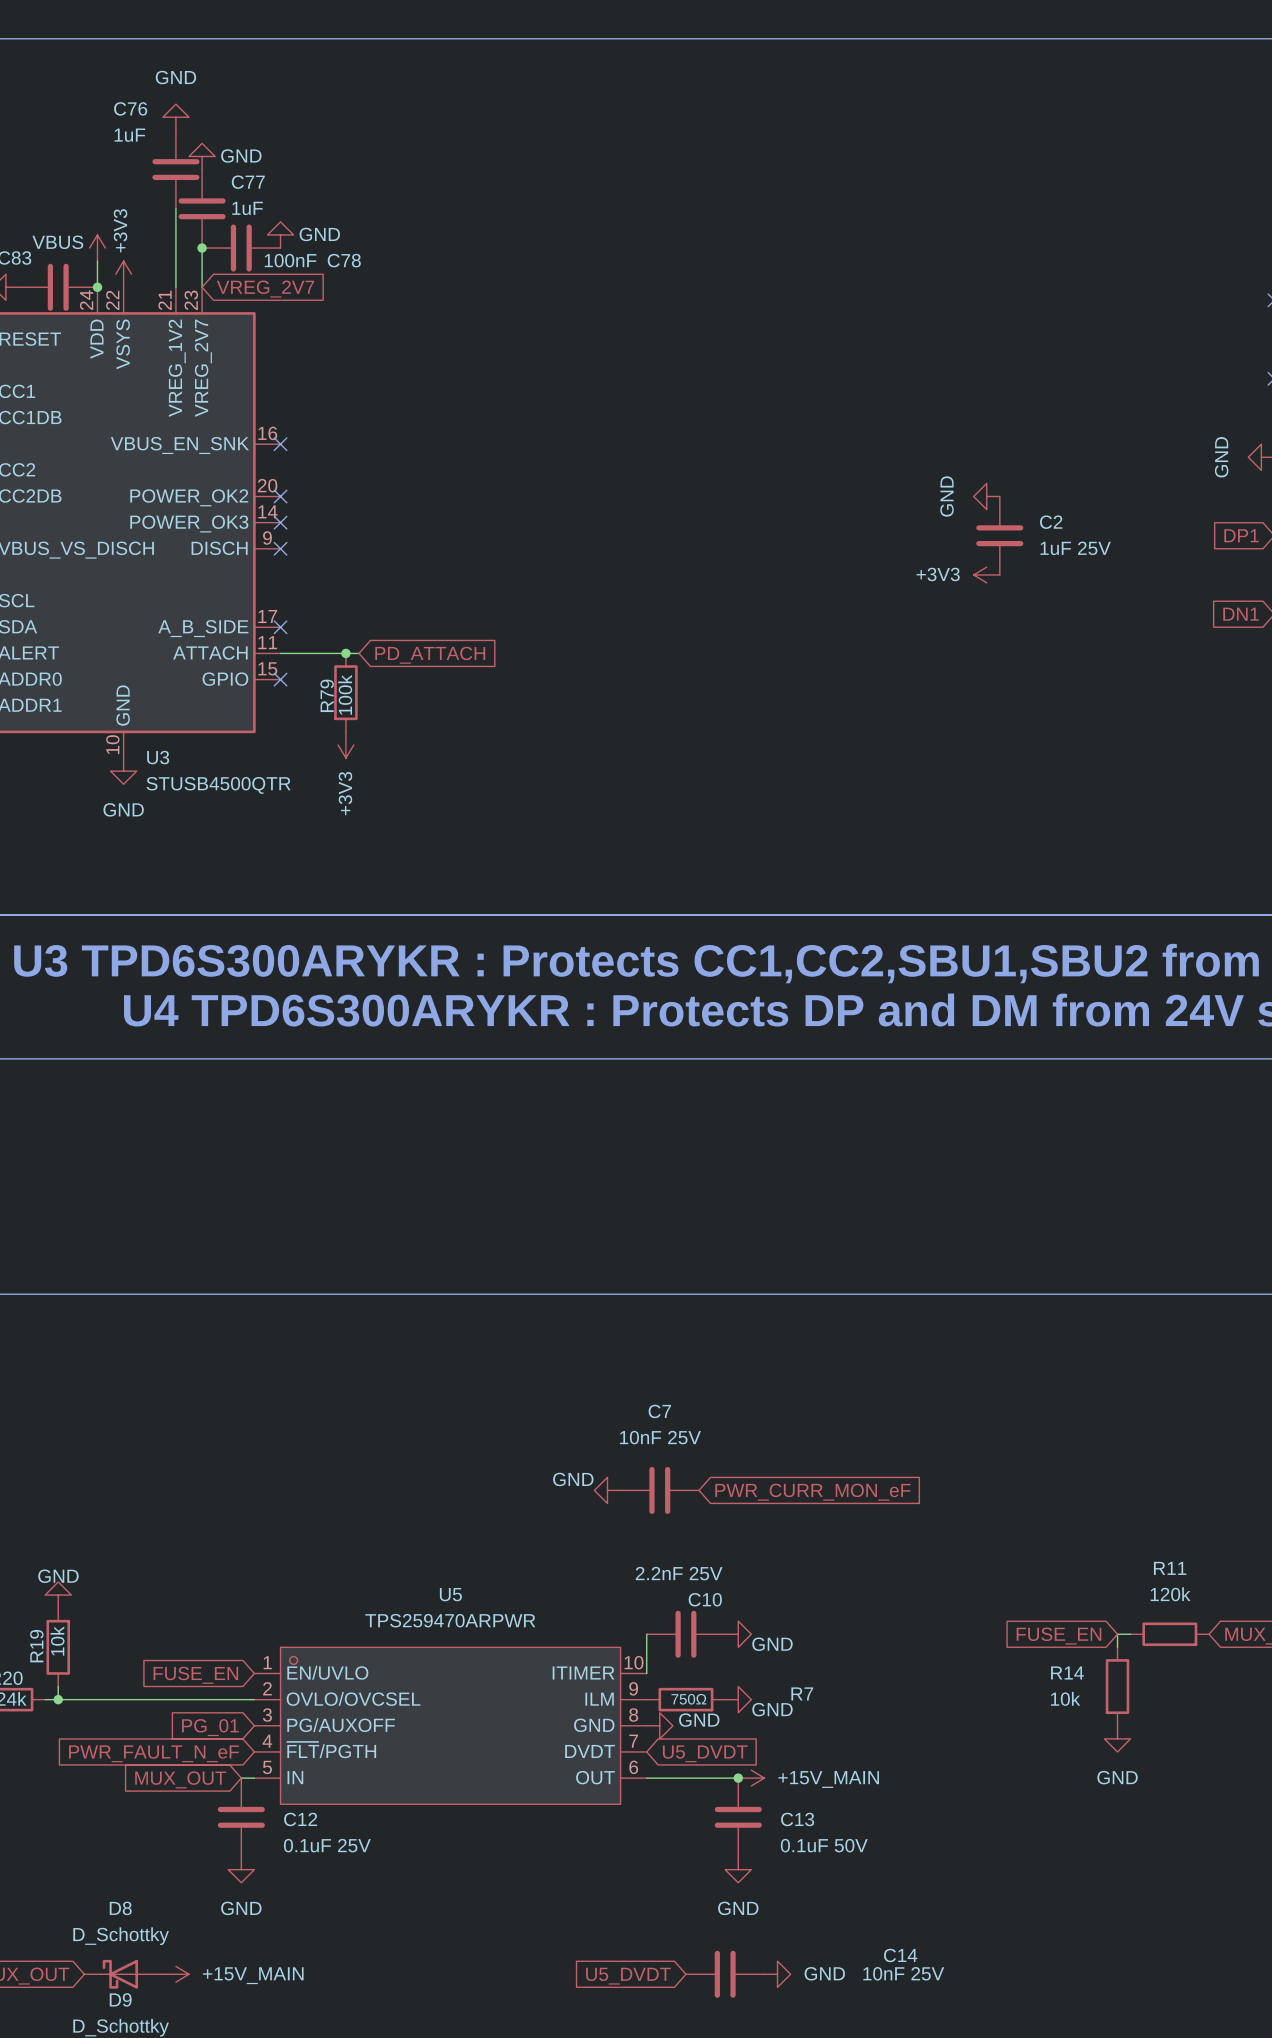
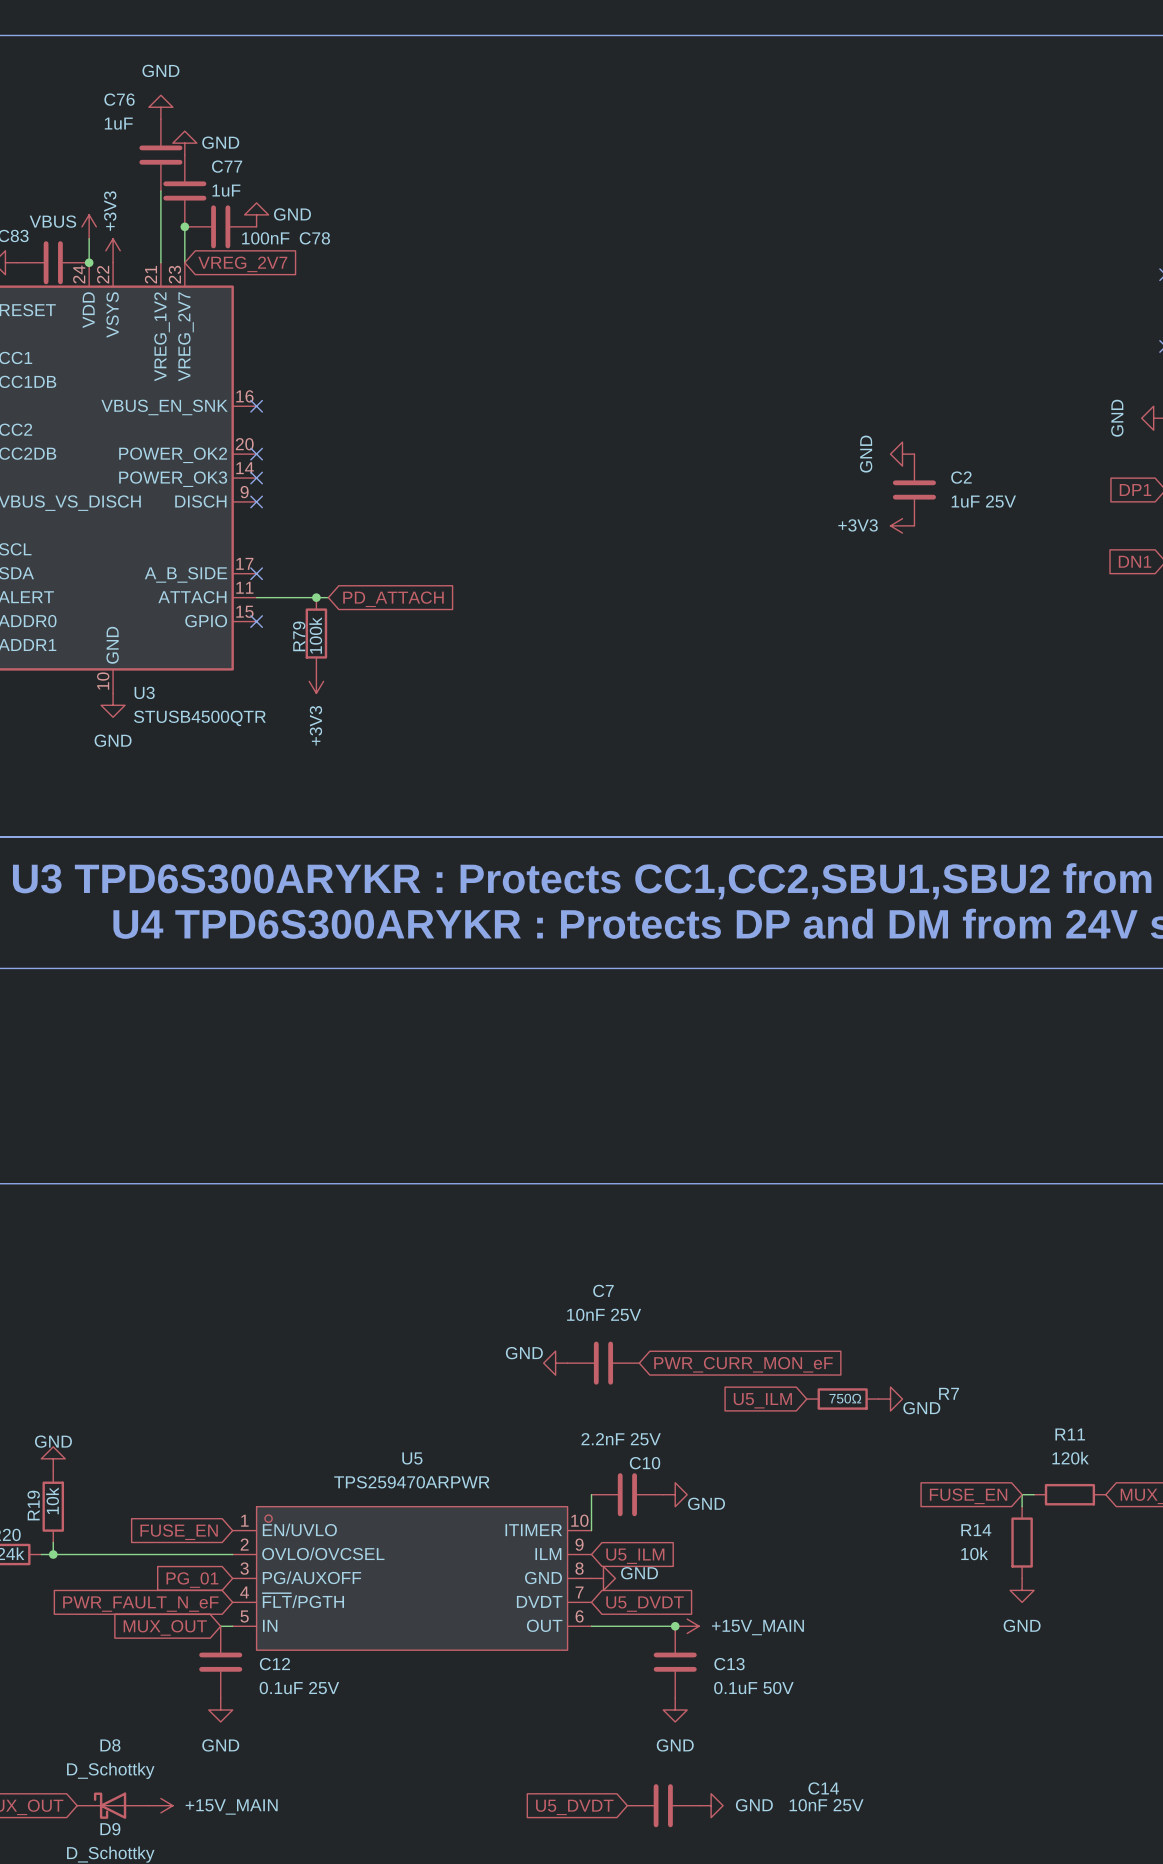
power symbol: none -> GND (890, 1399)
global label: none -> U5_ILM (762, 1400)
R7 position: (685, 1699) -> (842, 1399)
power symbol: GND (738, 1699) -> none
global label: none -> U5_ILM (635, 1556)

